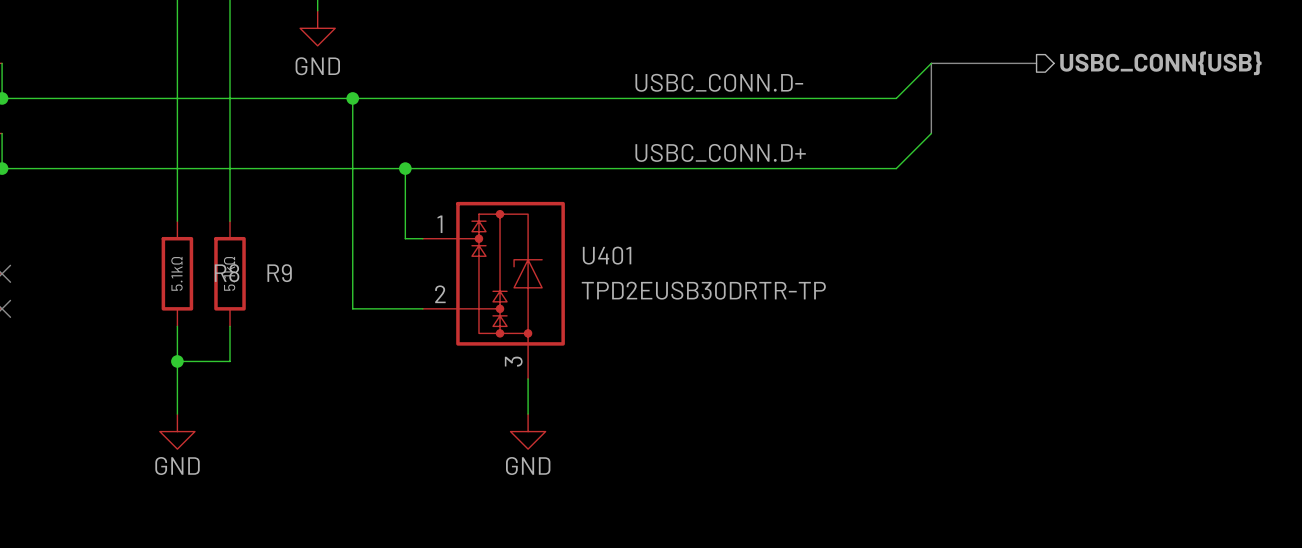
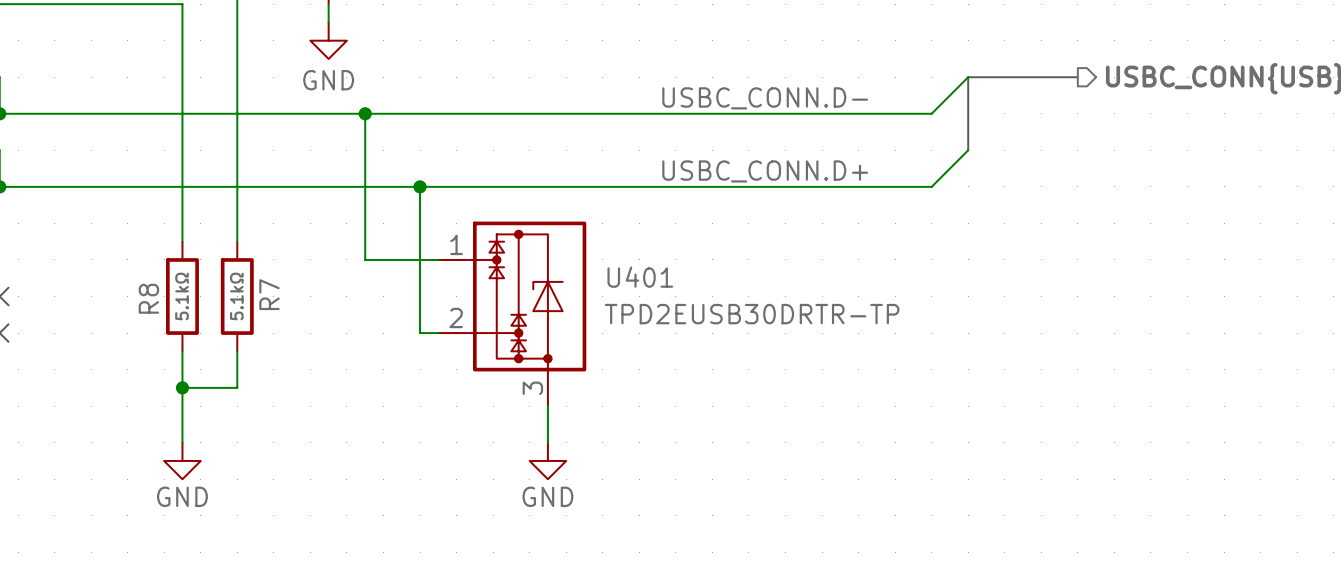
wire: (352, 238) (352, 308) (405, 308) -> (365, 259) (420, 259) (420, 333)
R8 name rotation: 0° (227, 273) -> 90° counterclockwise (148, 298)
R8 name position: R8 (227, 273) -> R8 (148, 298)
R9 name: R9 (279, 273) -> R7 (269, 294)

